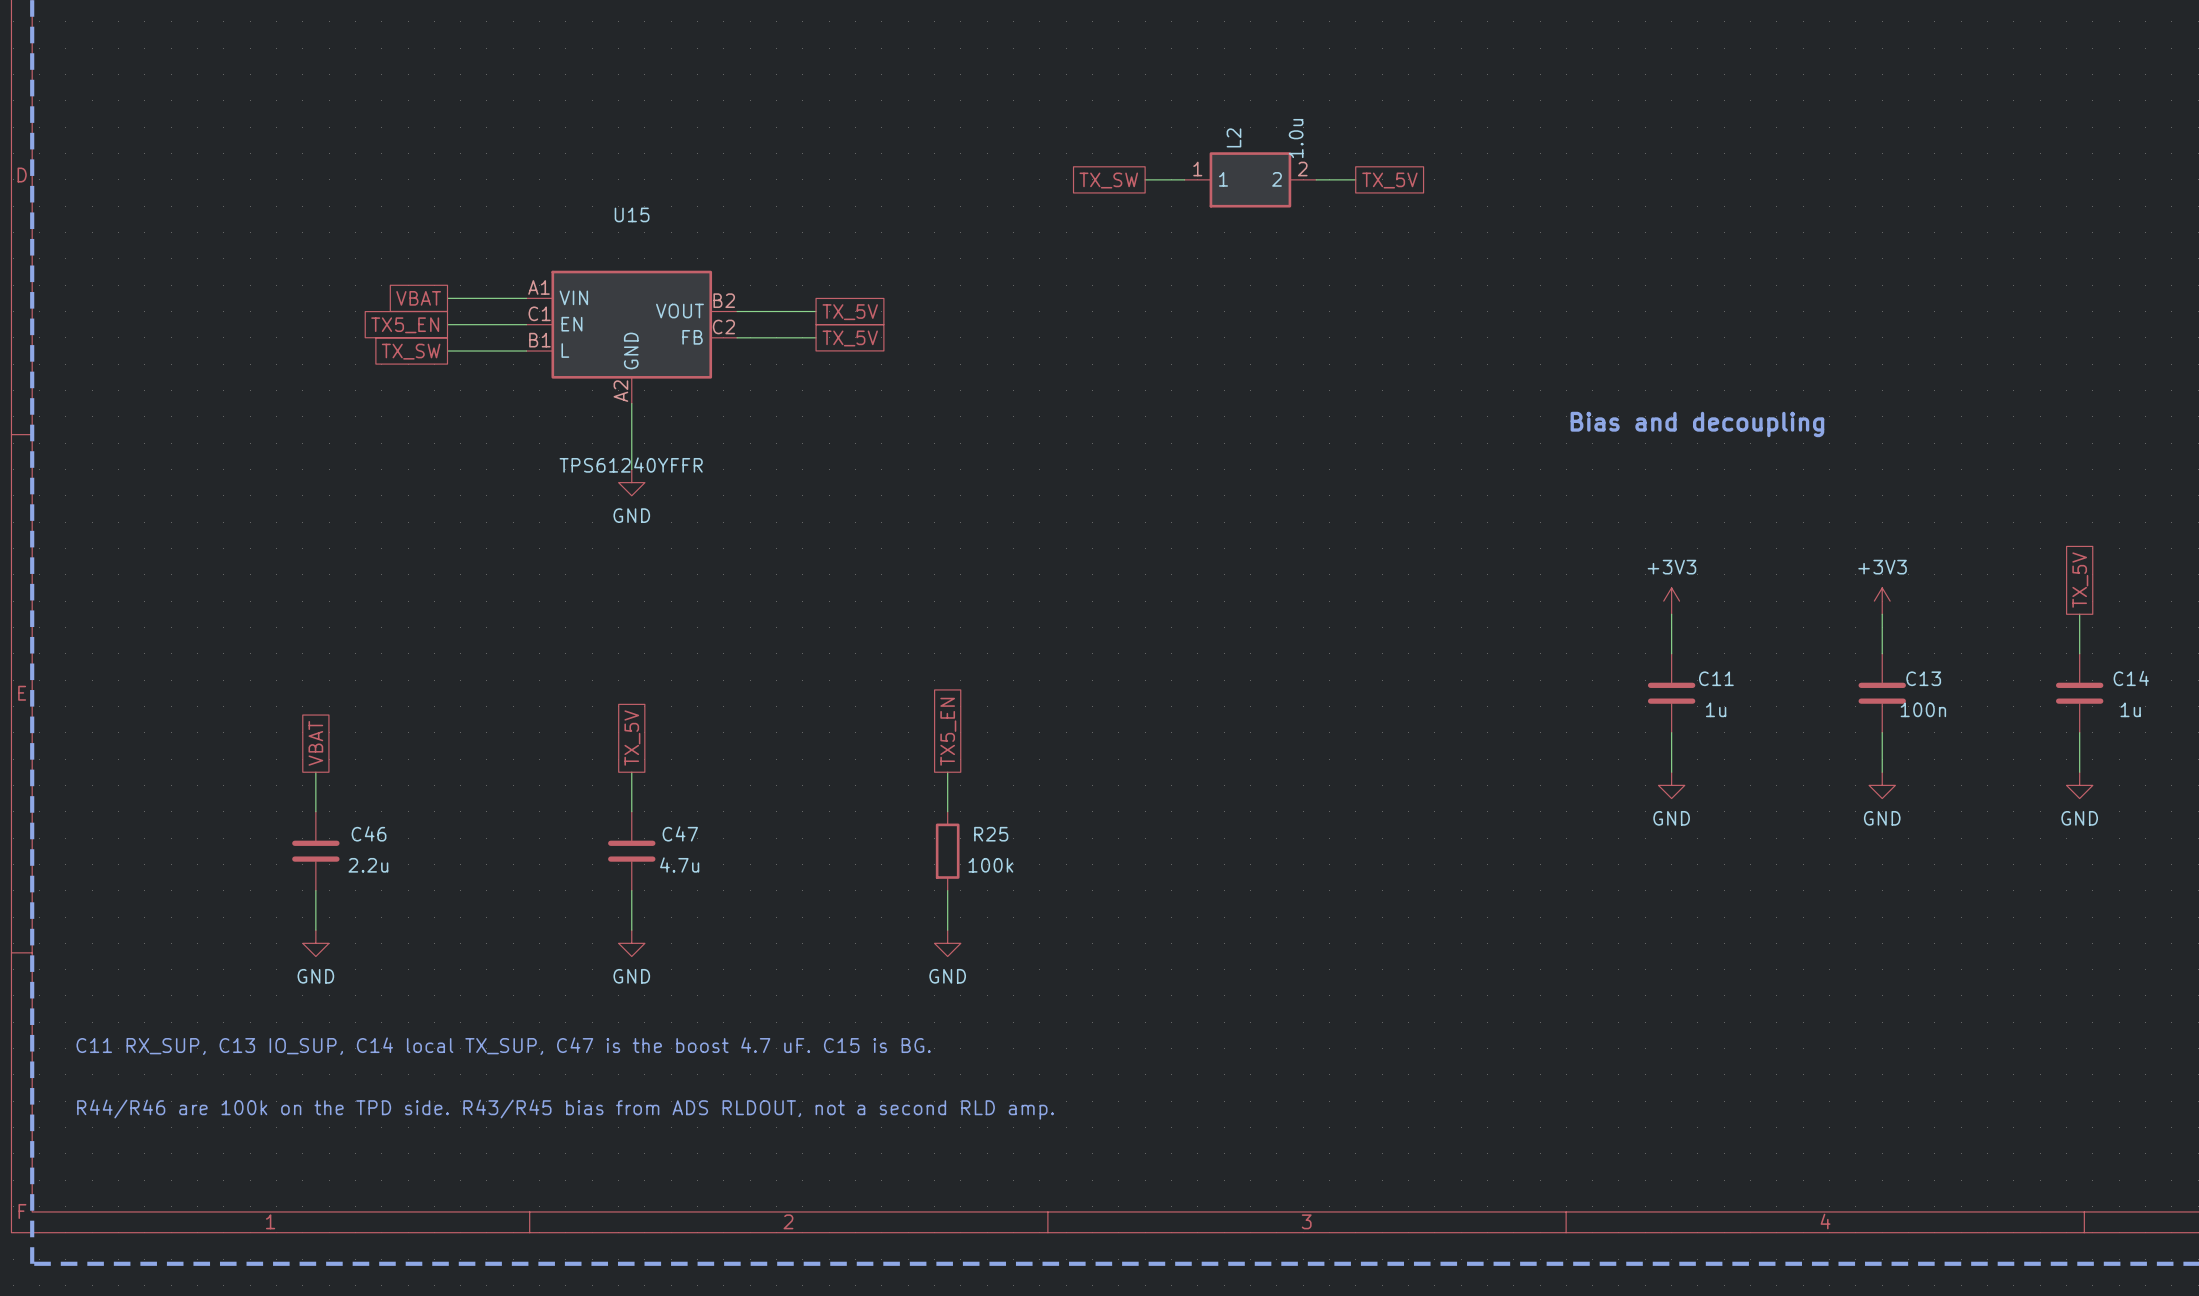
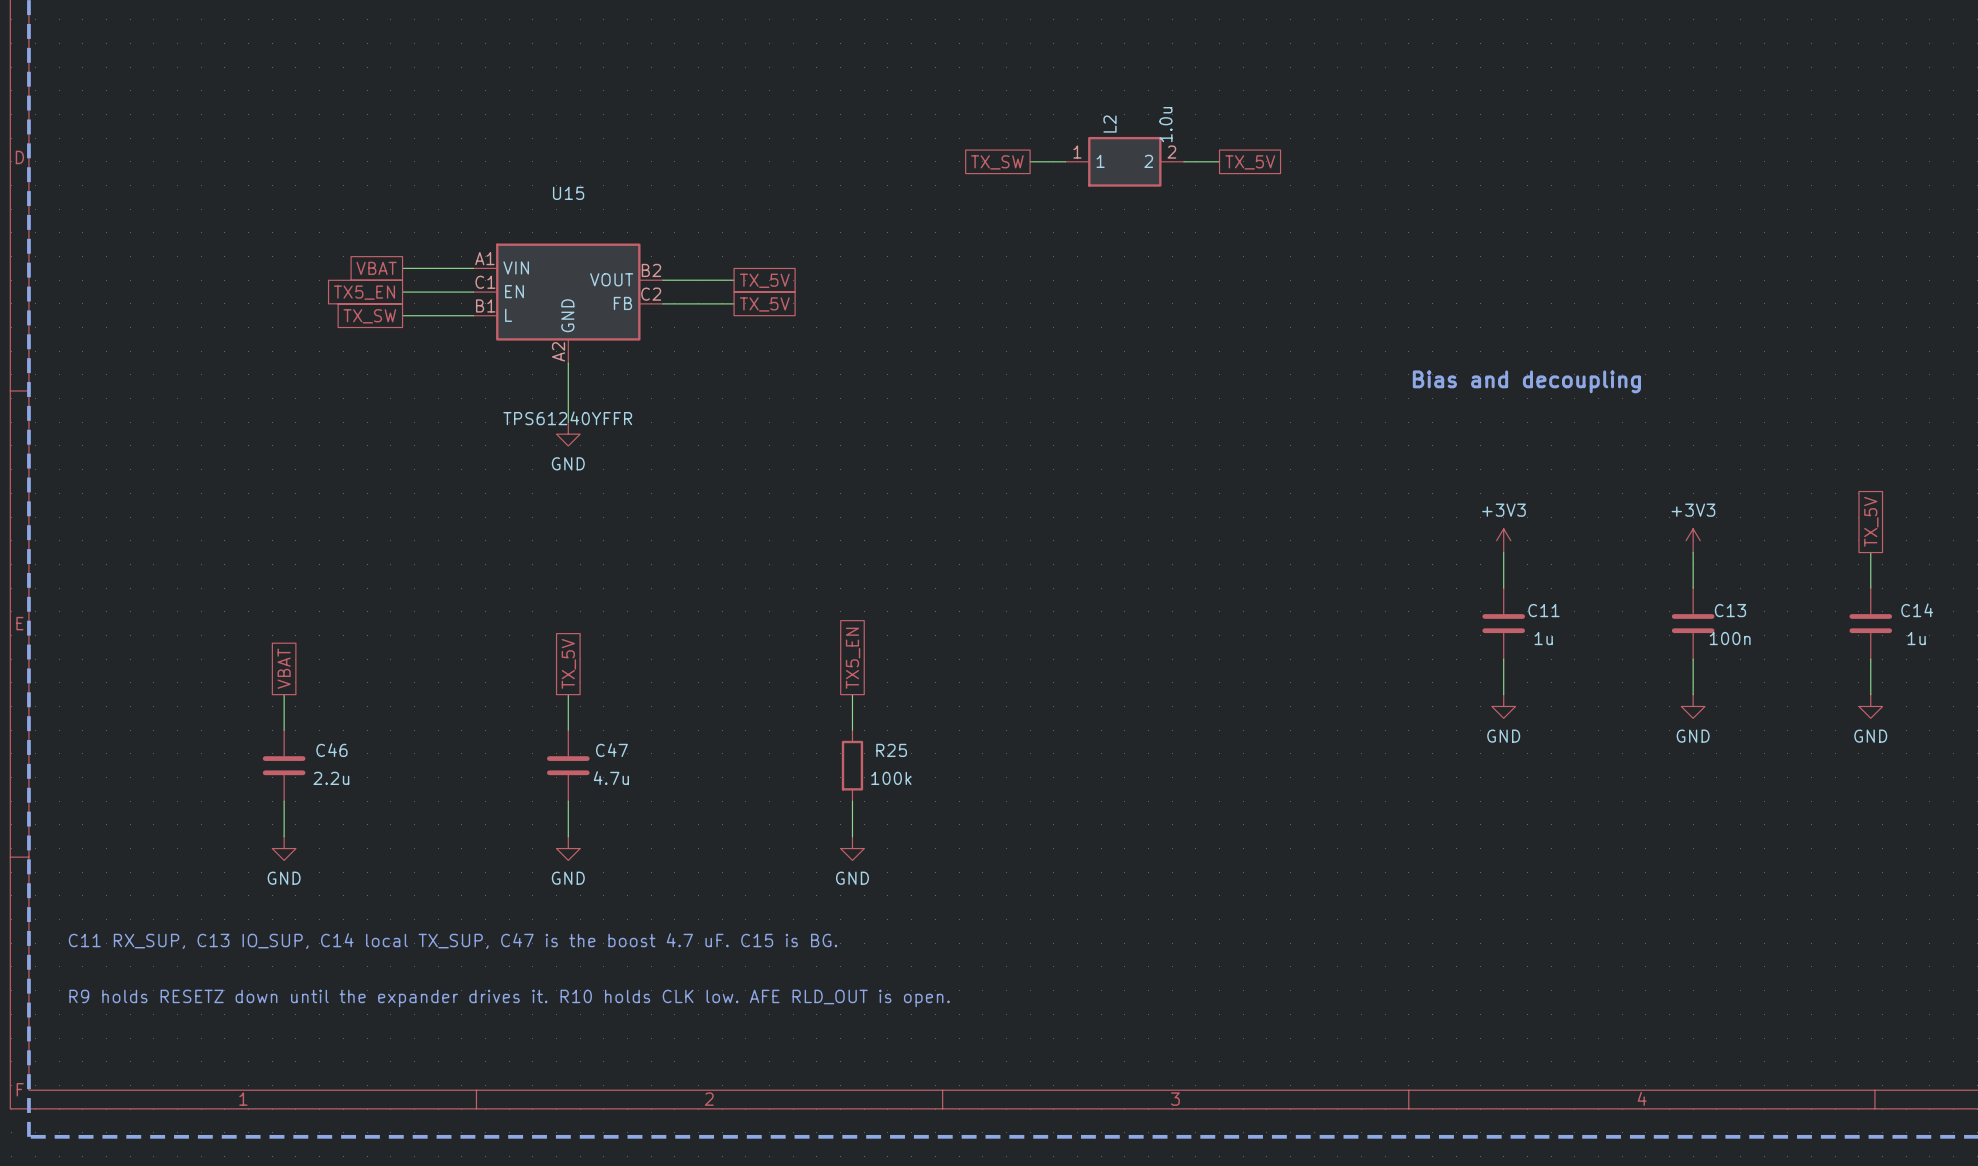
text: R44/R46 are 100k on the TPD side. R43/R45 bias from ADS RLDOUT, not a second RLD amp. (565, 1109) -> R9 holds RESETZ down until the expander drives it. R10 holds CLK low. AFE RLD_OUT is open. (509, 998)

